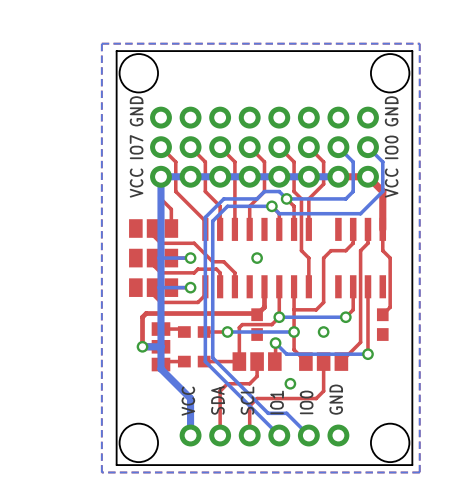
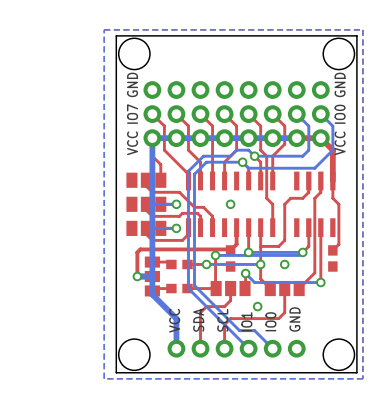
top track: (279, 317) (271, 324) (242, 324) (239, 327) (239, 361) -> (215, 255) (216, 288)
via: none -> (215, 255)
bottom track: none -> (299, 255) (215, 255)

